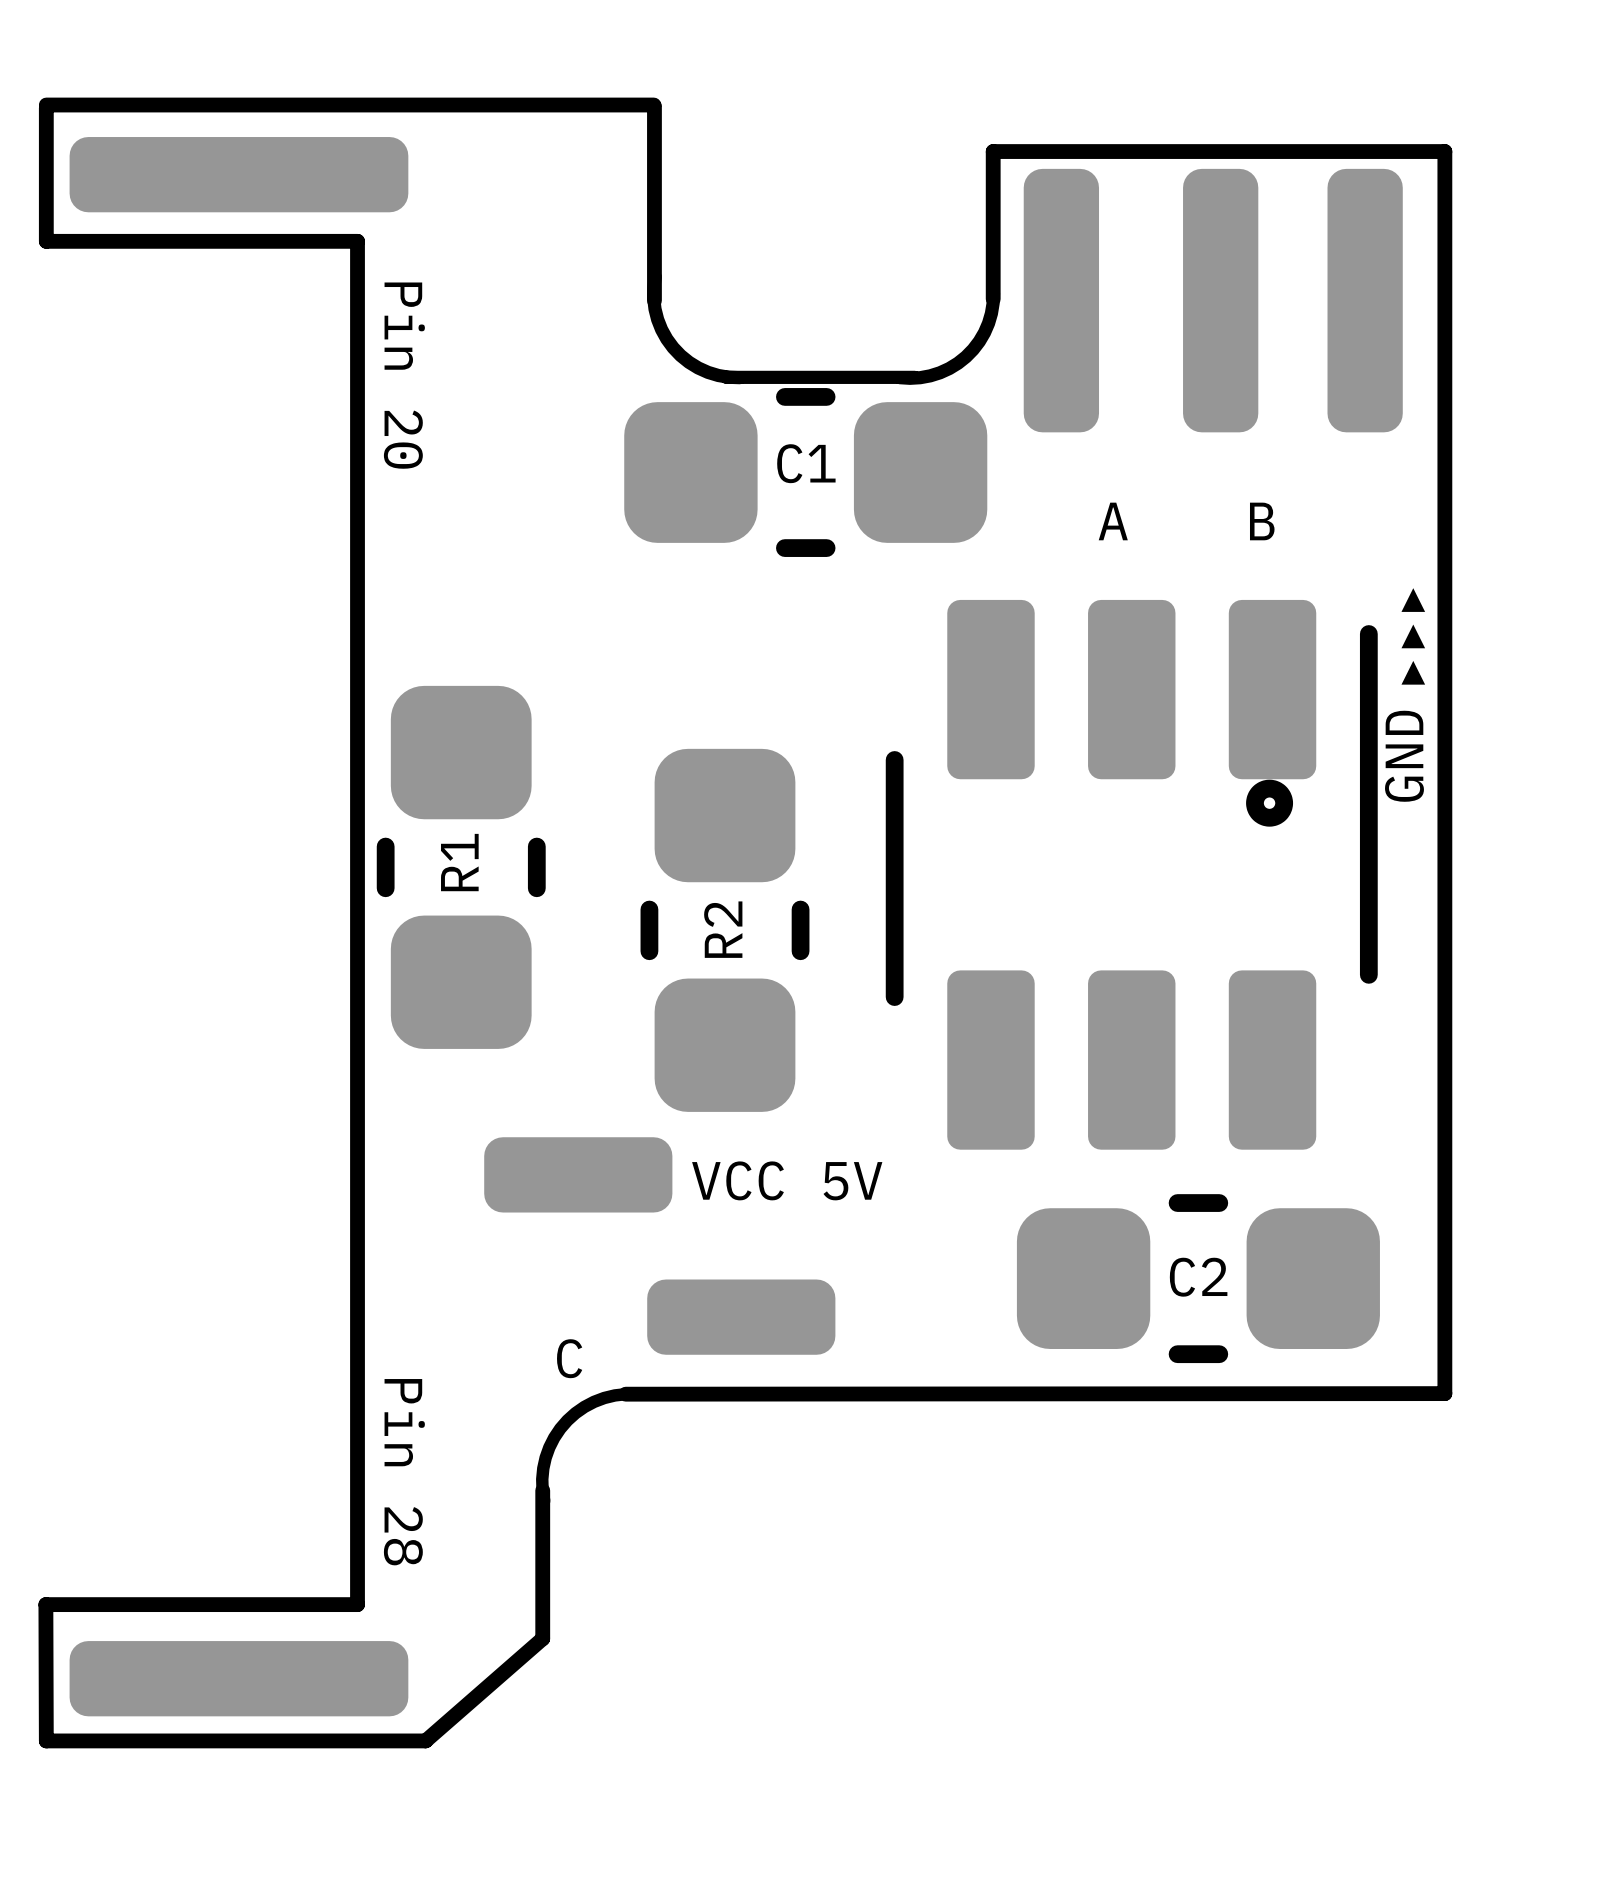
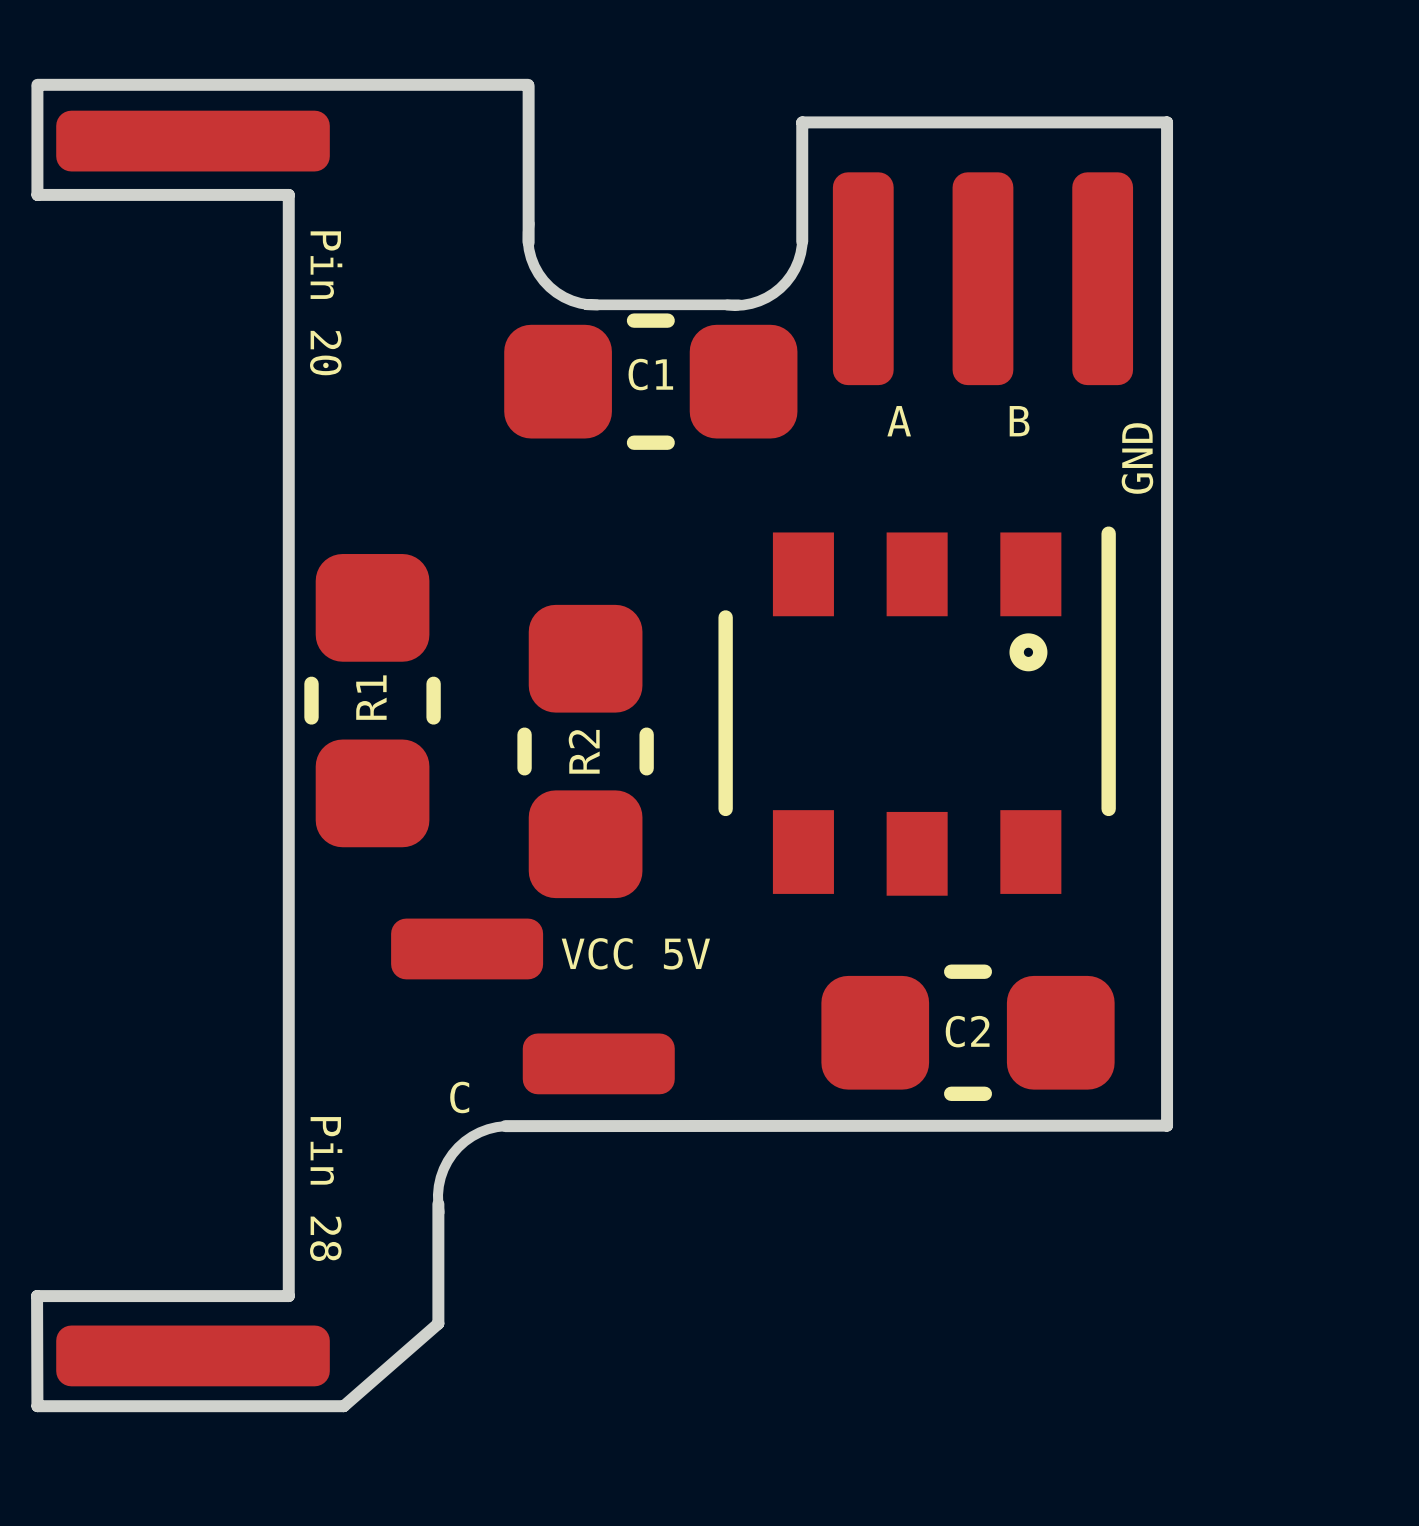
part position: (1061, 300) -> (863, 278)
part position: (1220, 300) -> (982, 278)
part position: (1365, 300) -> (1102, 278)
part footprint: [885, 599, 1378, 1150] -> [718, 526, 1116, 896]
text: ▲ (1413, 600) -> none
text: ▲ (1413, 636) -> none
text: ▲ (1413, 672) -> none
text position: GND (1404, 756) -> GND (1137, 458)

